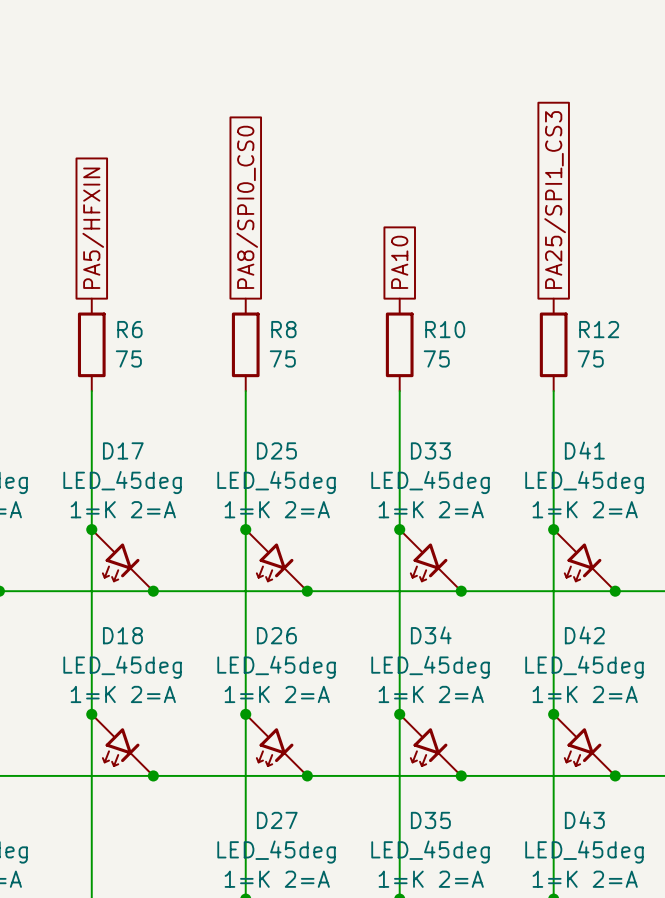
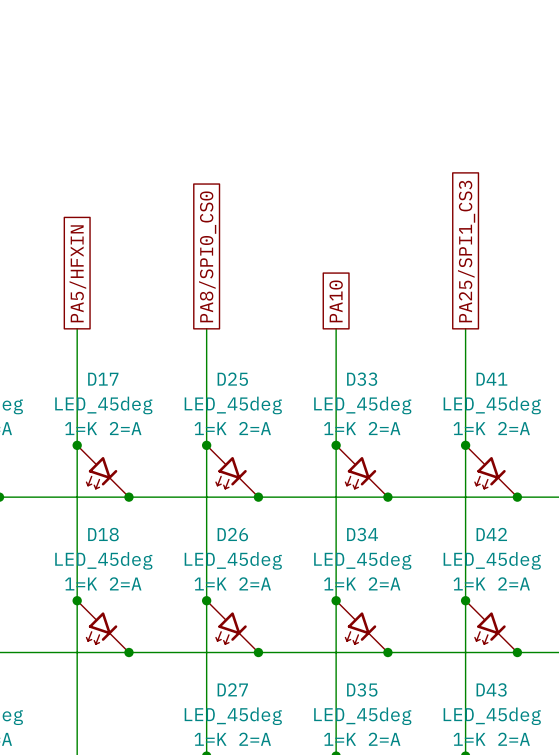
global label position: PA25/SPI1_CS3 (555, 200) -> PA25/SPI1_CS3 (466, 251)
global label position: PA8/SPI0_CS0 (247, 207) -> PA8/SPI0_CS0 (207, 256)
global label position: PA5/HFXIN (93, 228) -> PA5/HFXIN (77, 273)
global label position: PA10 (399, 262) -> PA10 (336, 301)
R6: 75 (91, 344) -> none
R8: 75 (245, 344) -> none
R10: 75 (399, 344) -> none
R12: 75 (553, 344) -> none

